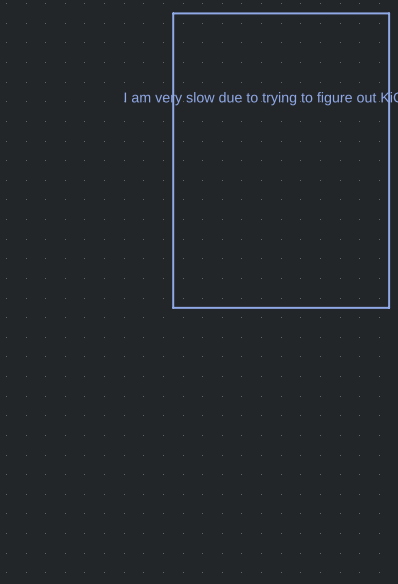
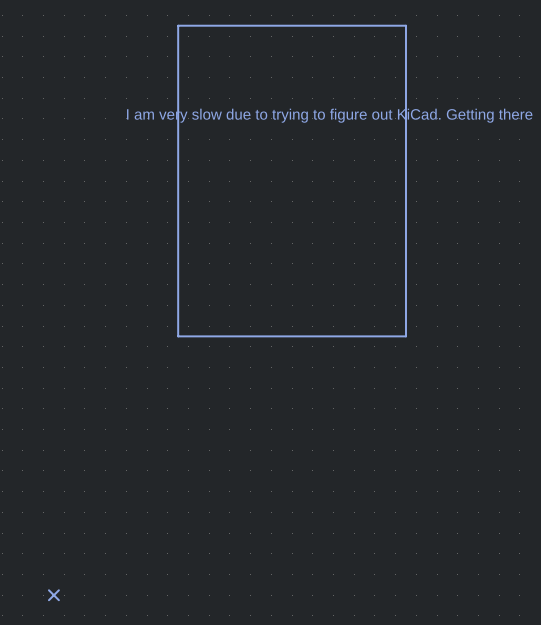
no-connect mark: none -> (53, 595)

